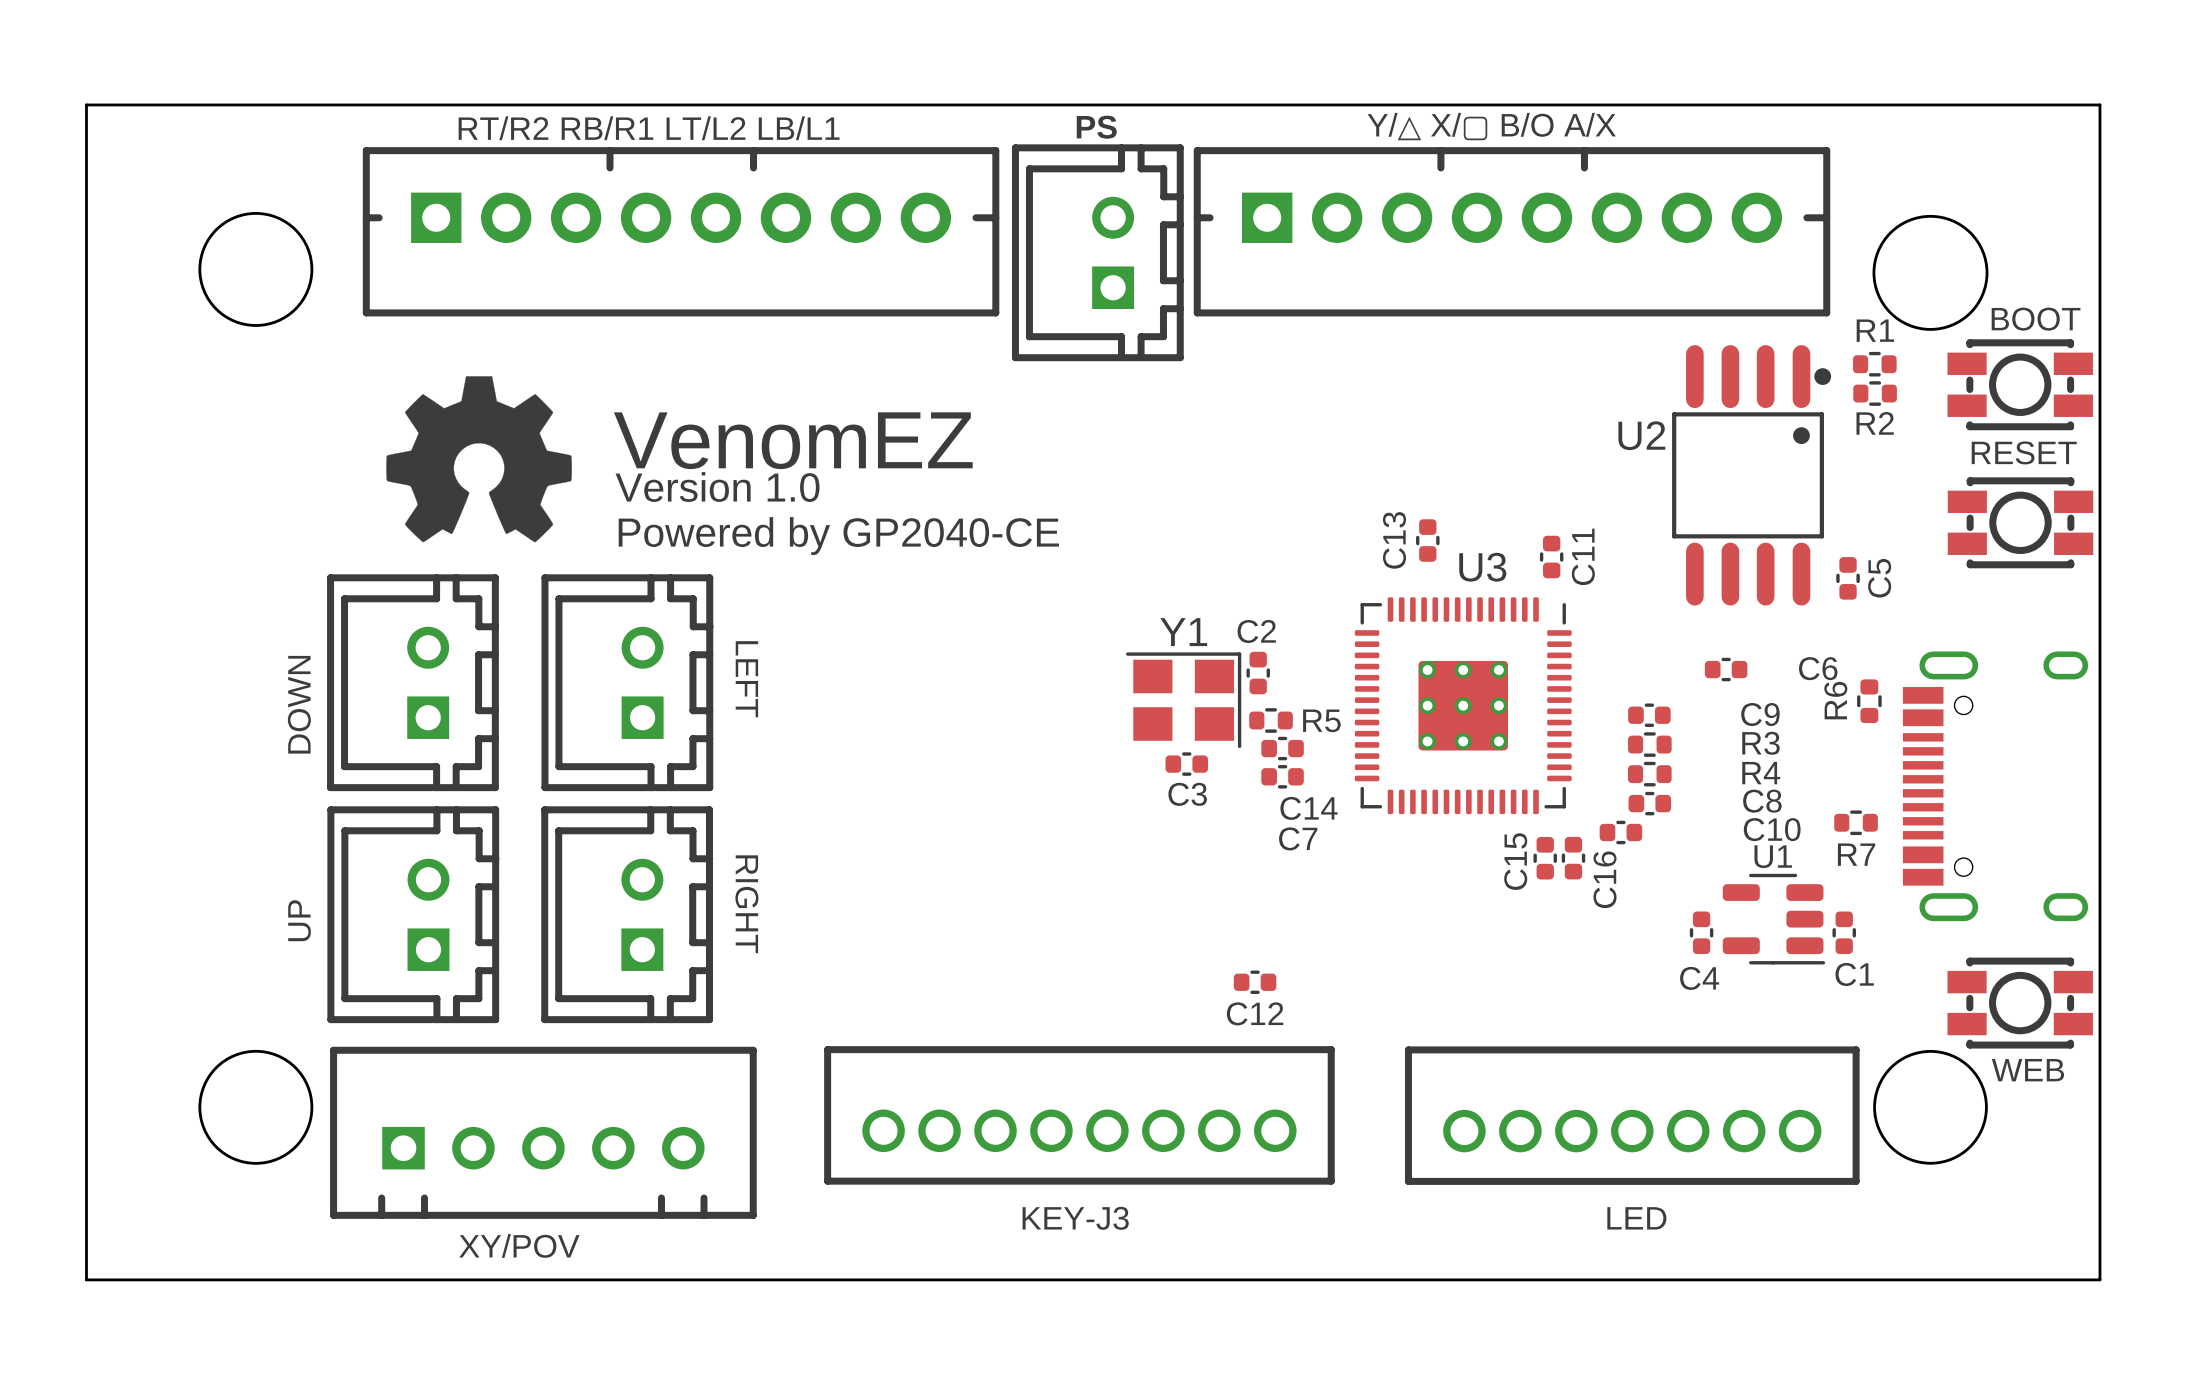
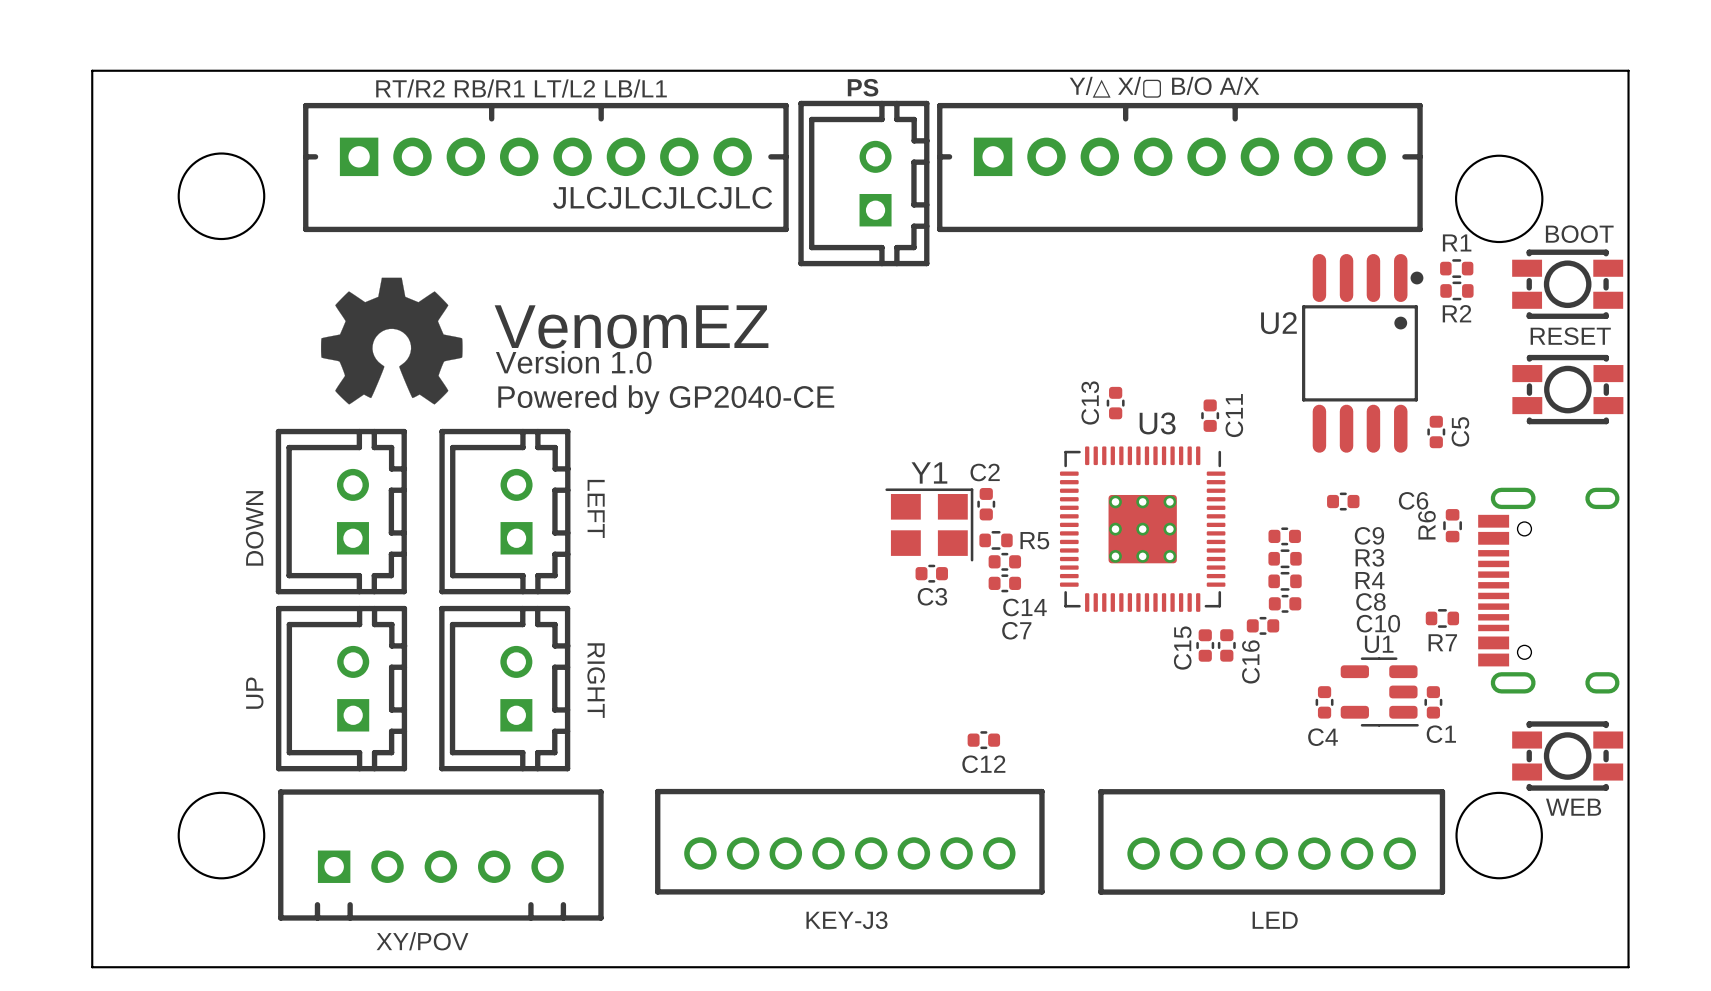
text: none -> JLCJLCJLCJLC (662, 197)

